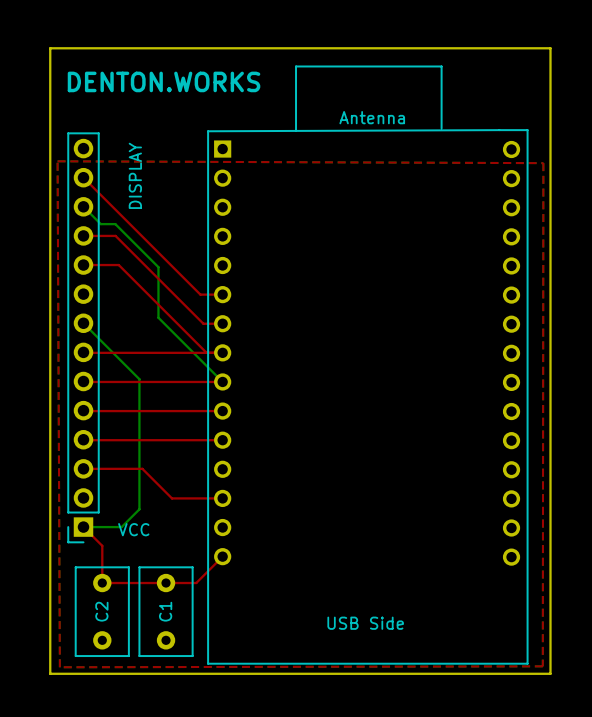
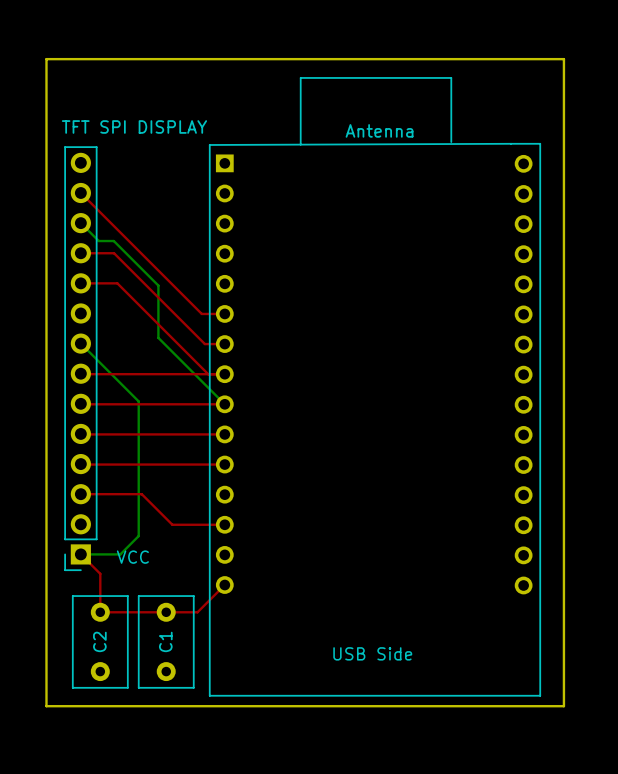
text: DENTON.WORKS (164, 81) -> none
top zone outline: (57, 161) (543, 163) (542, 666) (59, 667) (57, 161) -> none
part value: DISPLAY (135, 175) -> TFT SPI DISPLAY (134, 126)

